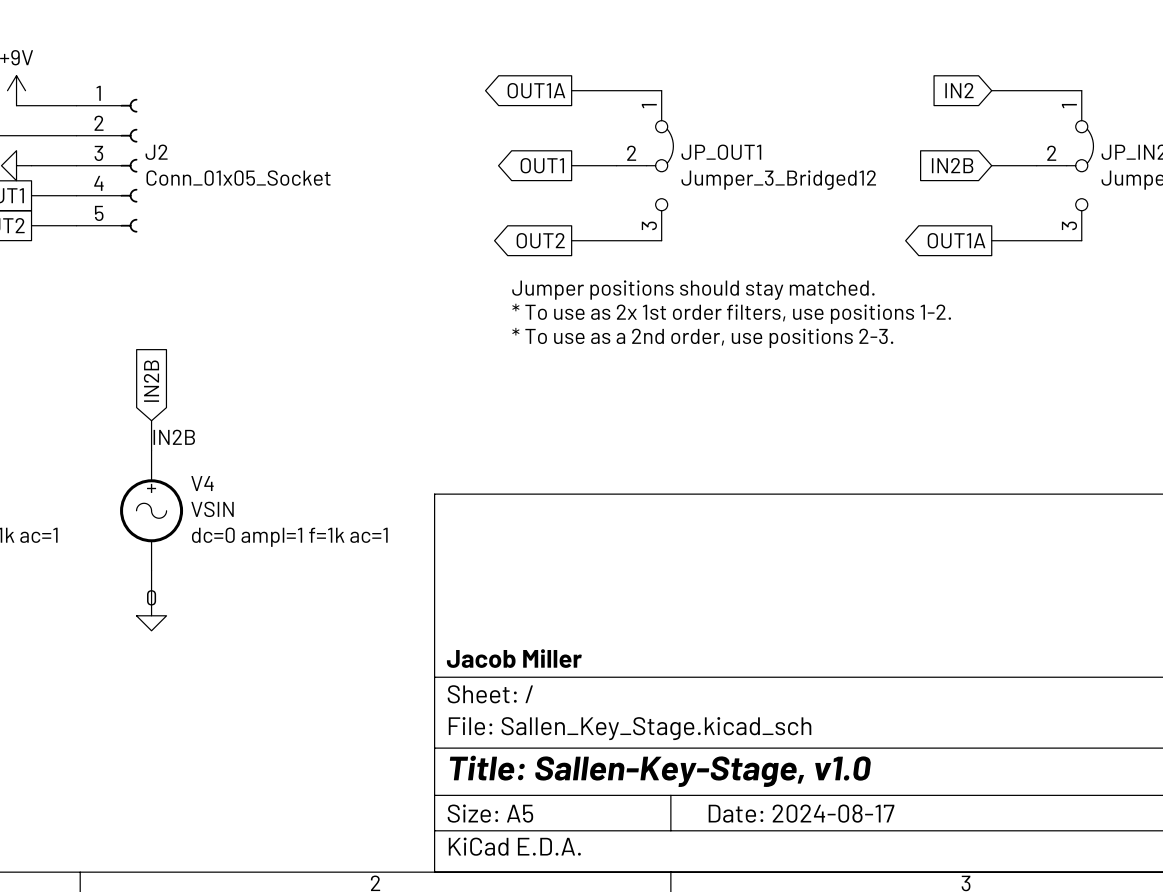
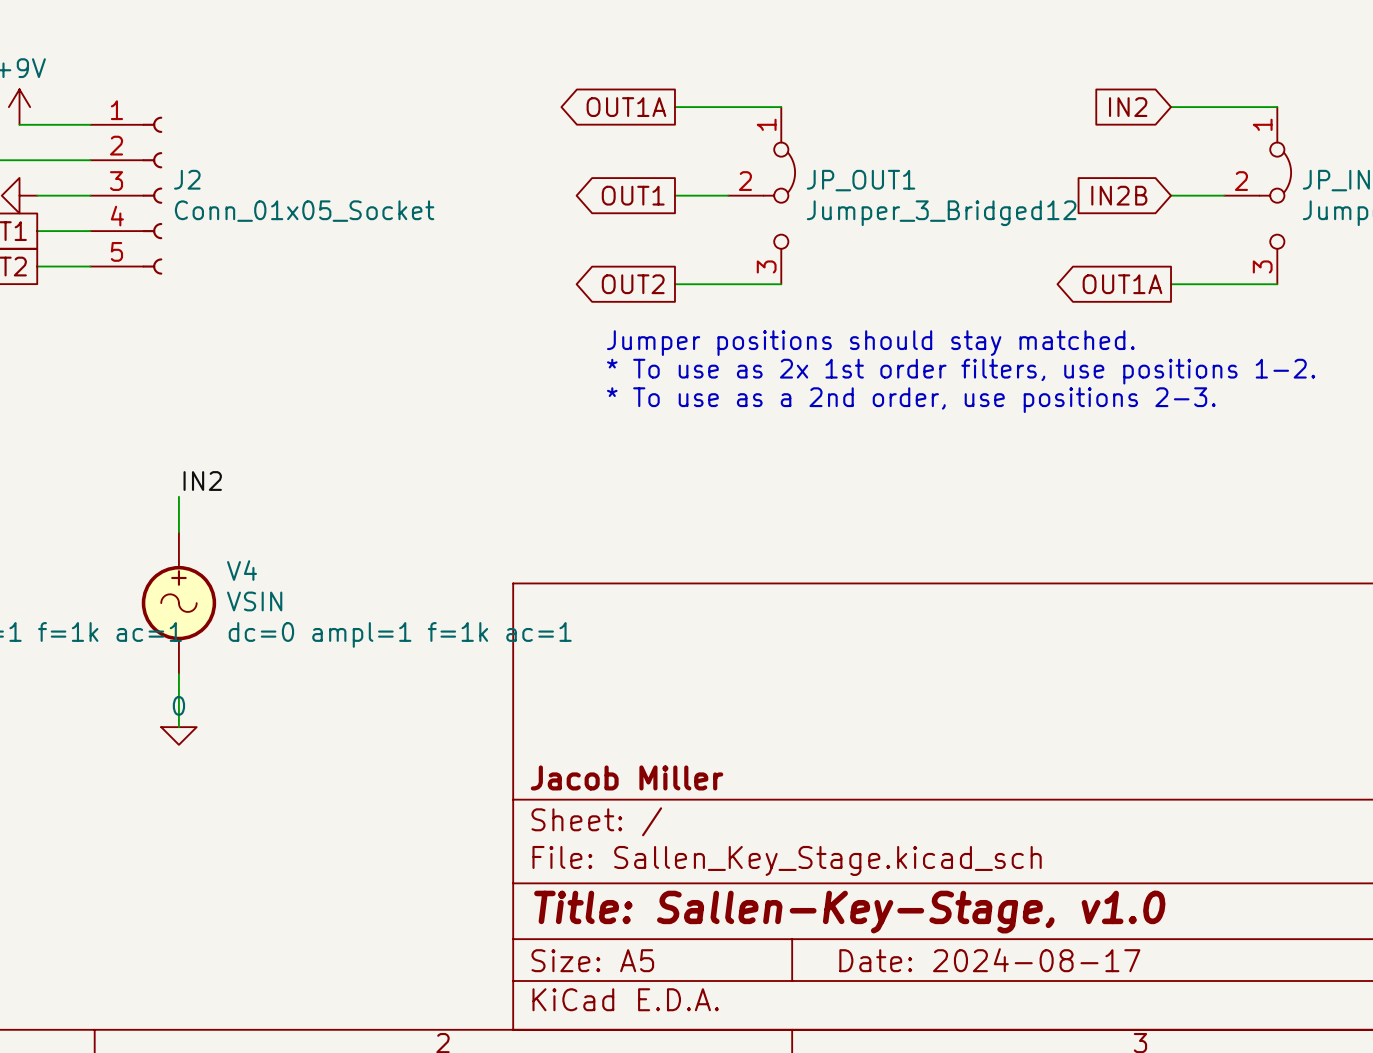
global label: IN2B (151, 381) -> none
label: IN2B (174, 437) -> IN2 (202, 481)

